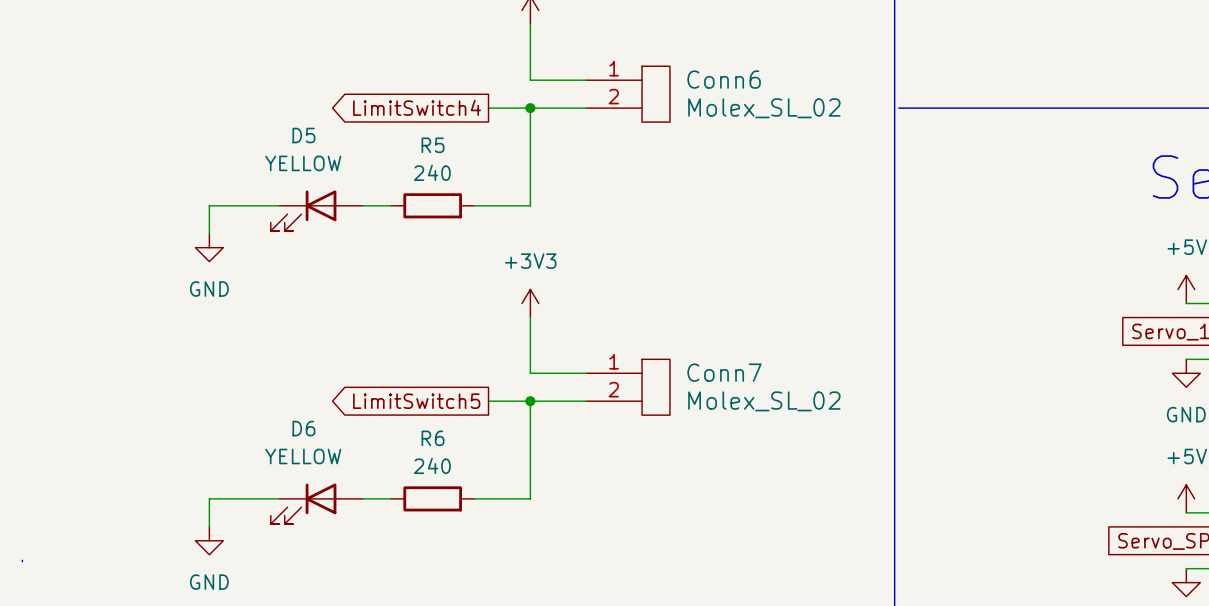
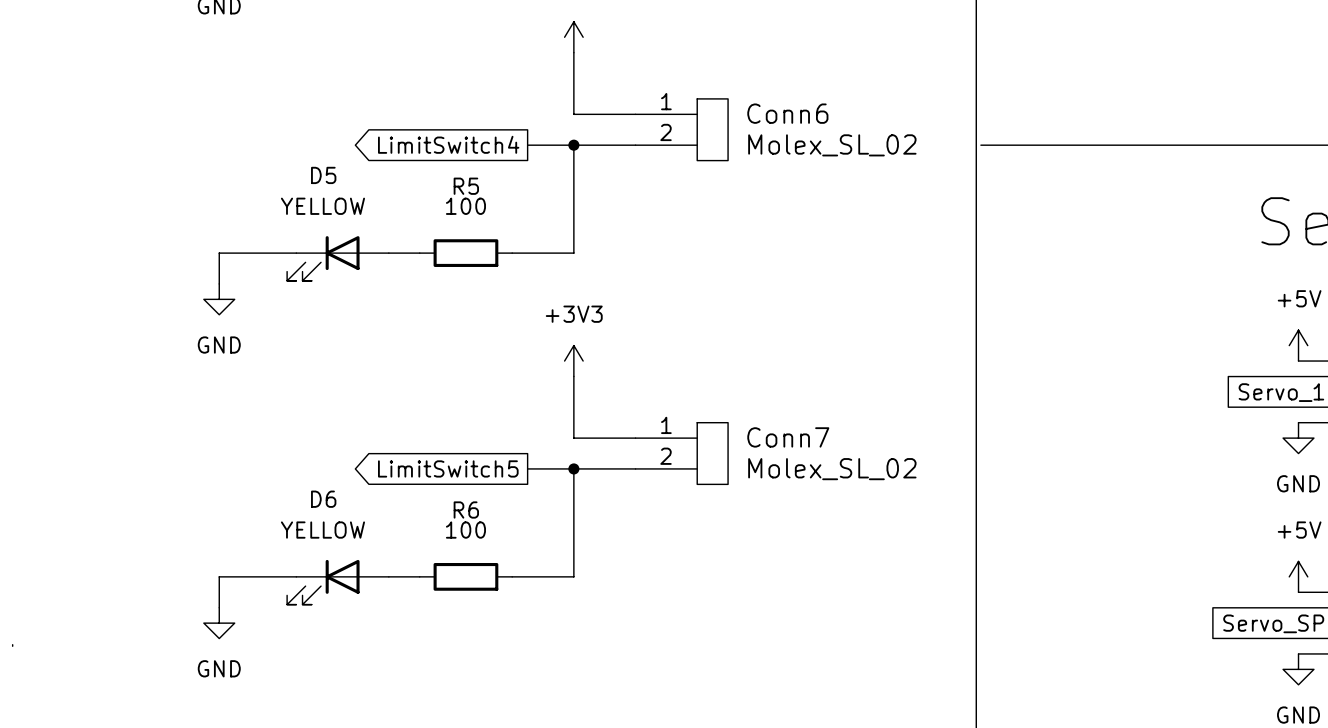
R5 value: 240 (432, 172) -> 100 (465, 206)
R6 value: 240 (432, 465) -> 100 (465, 530)

